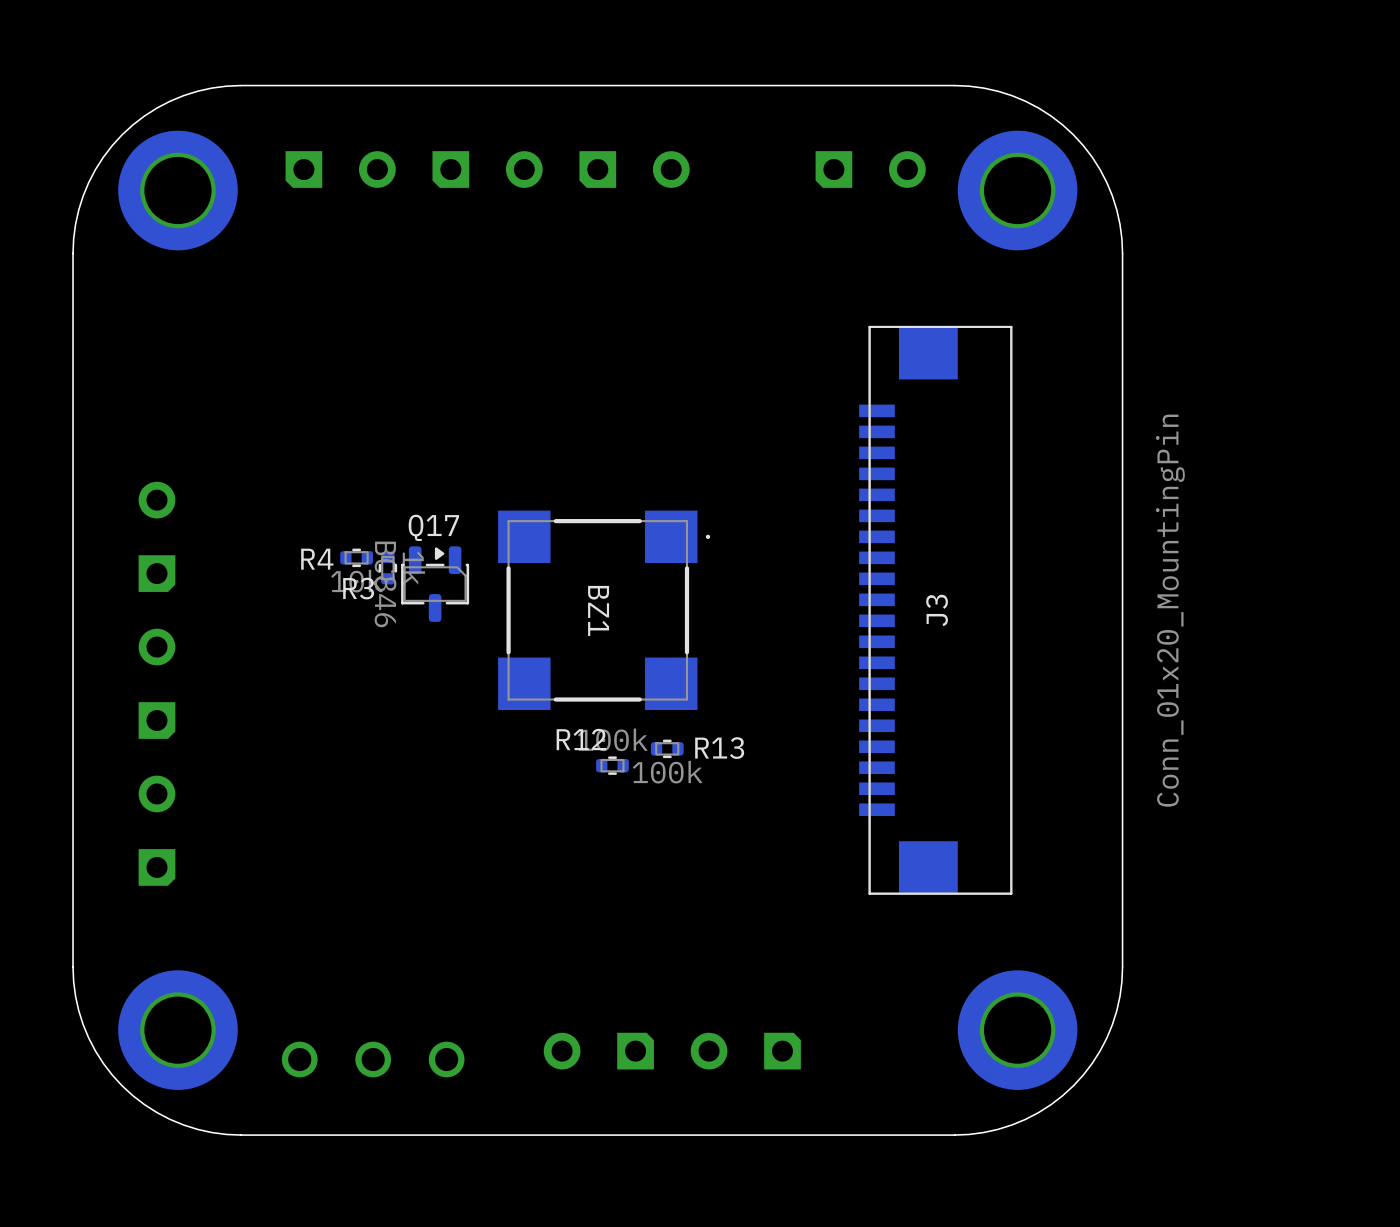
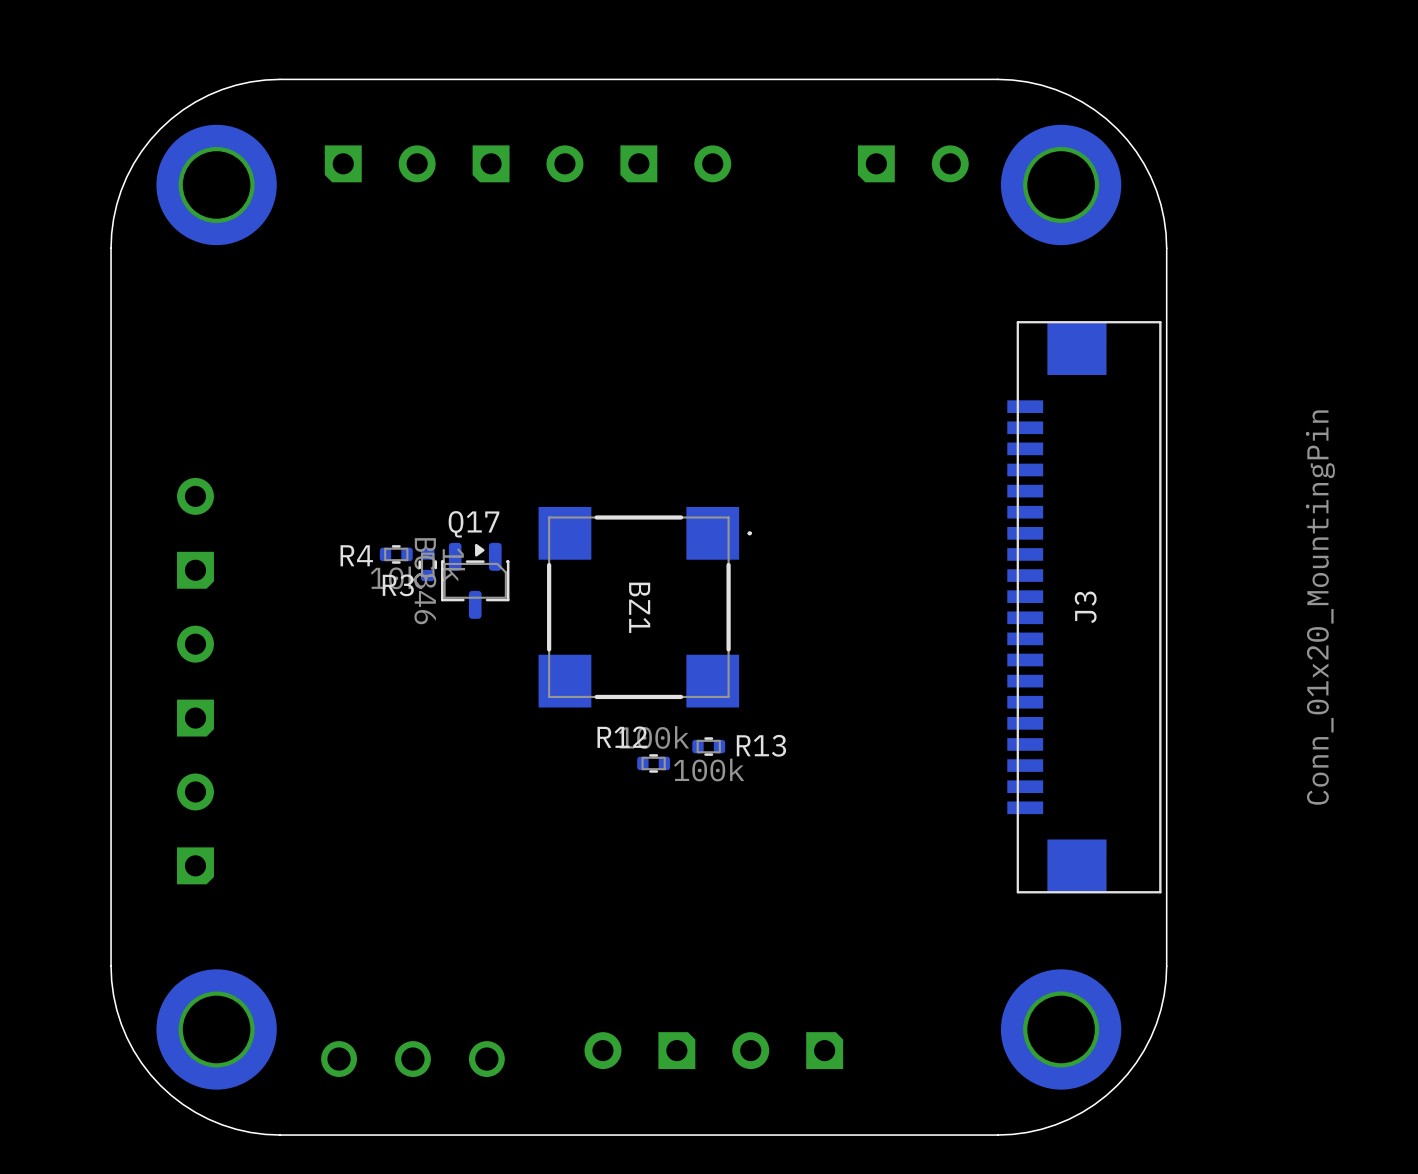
J3 position: (935, 610) -> (1084, 607)

